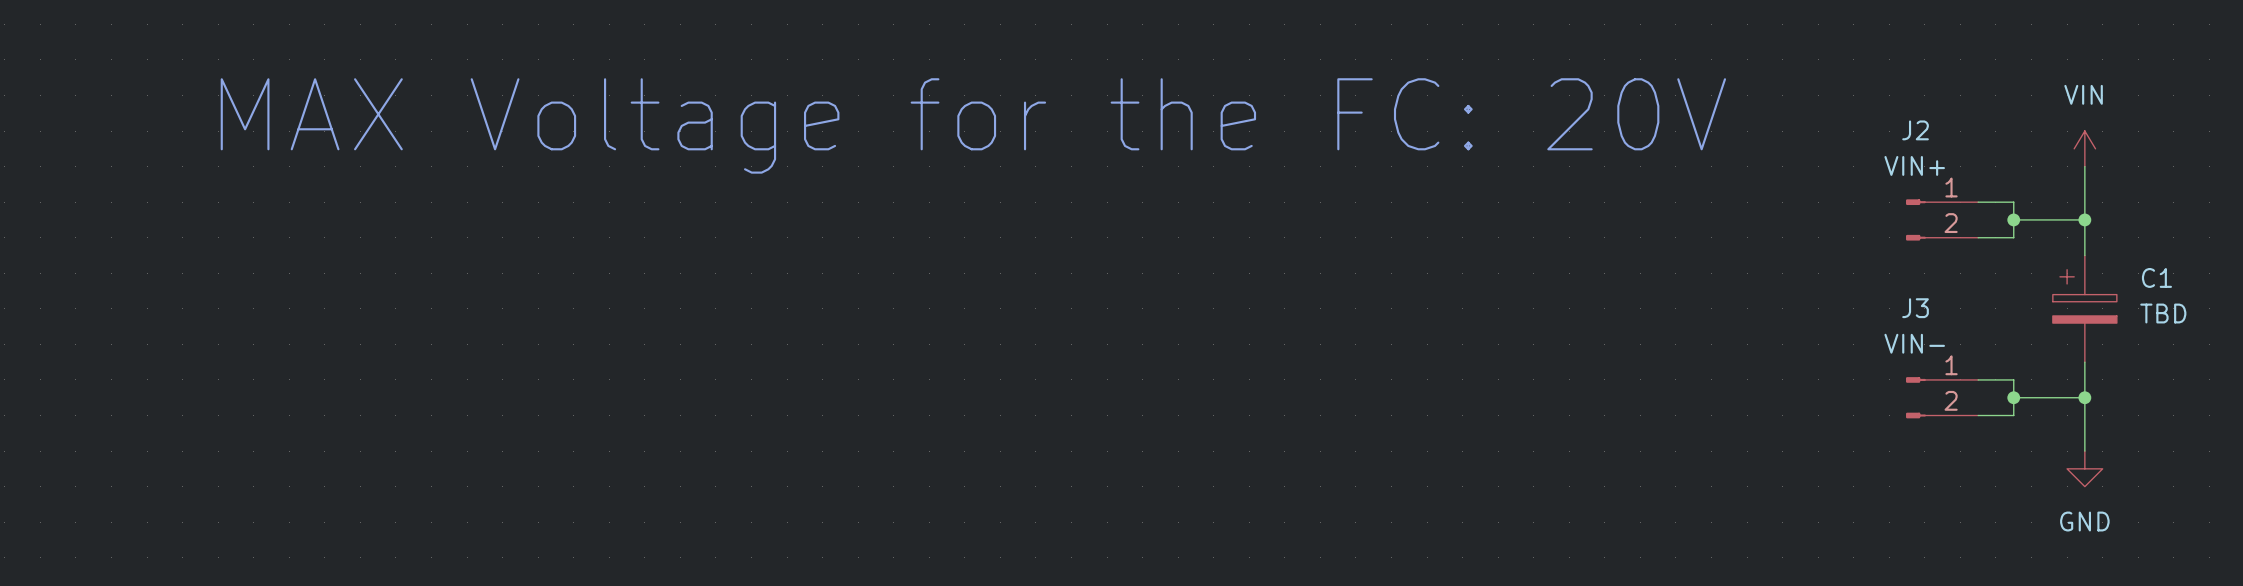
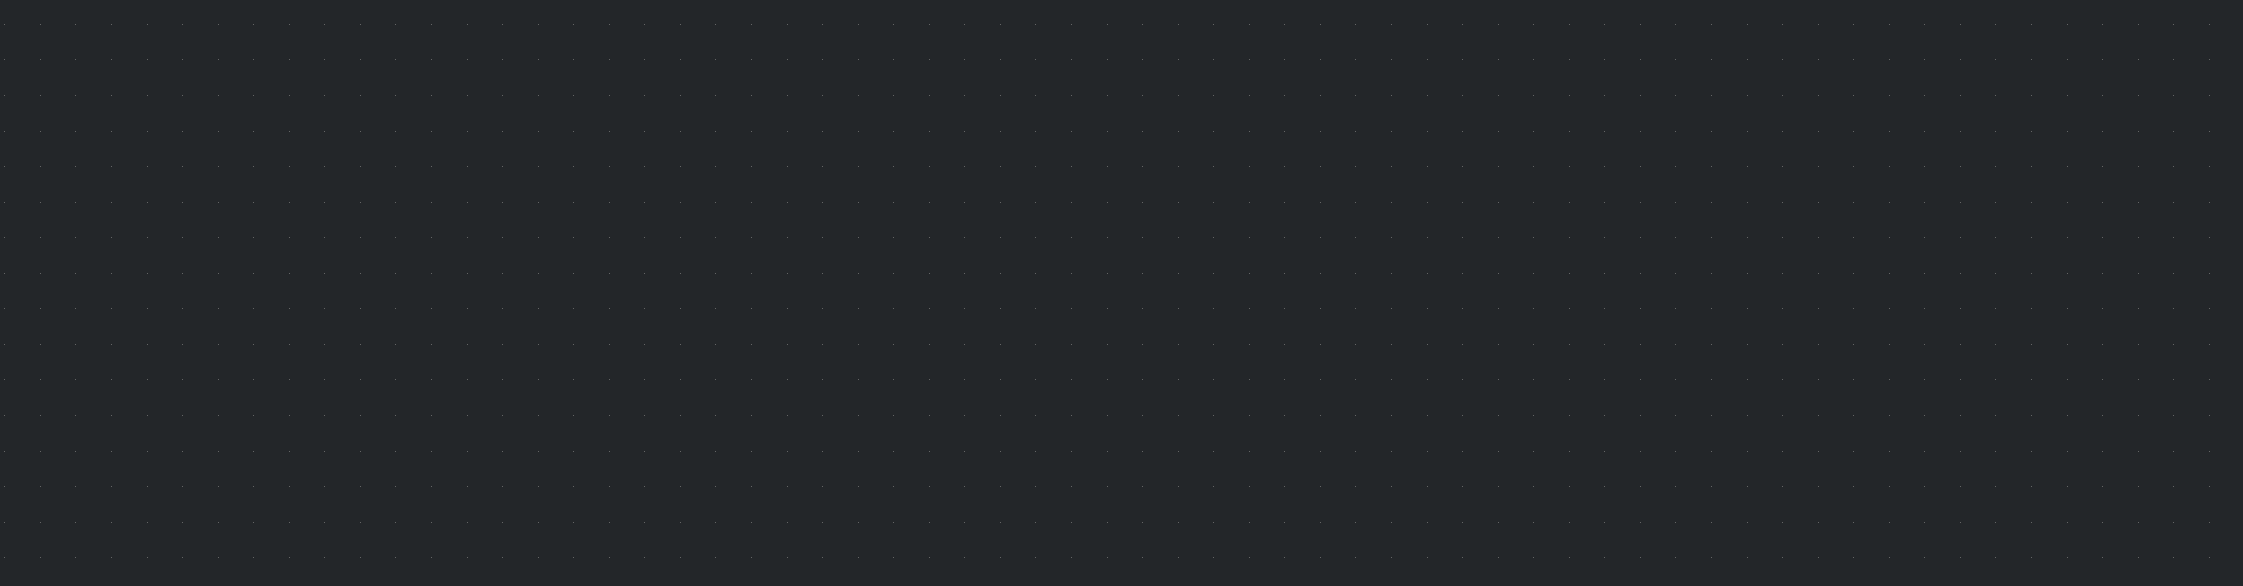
text: MAX Voltage for the FC: 20V (973, 125) -> none
power symbol: VIN (2084, 148) -> none
wire: (2084, 166) (2084, 255) -> none
wire: (1978, 202) (2013, 202) (2013, 237) (1978, 237) -> none
J2: VIN+ (1942, 219) -> none
wire: (2013, 219) (2084, 219) -> none
junction: (2013, 219) -> none
junction: (2084, 219) -> none
C1: TBD (2084, 308) -> none
wire: (2084, 362) (2084, 451) -> none
wire: (1978, 379) (2013, 379) (2013, 415) (1978, 415) -> none
J3: VIN- (1942, 397) -> none
wire: (2013, 397) (2084, 397) -> none
junction: (2013, 397) -> none
junction: (2084, 397) -> none
power symbol: GND (2084, 468) -> none

